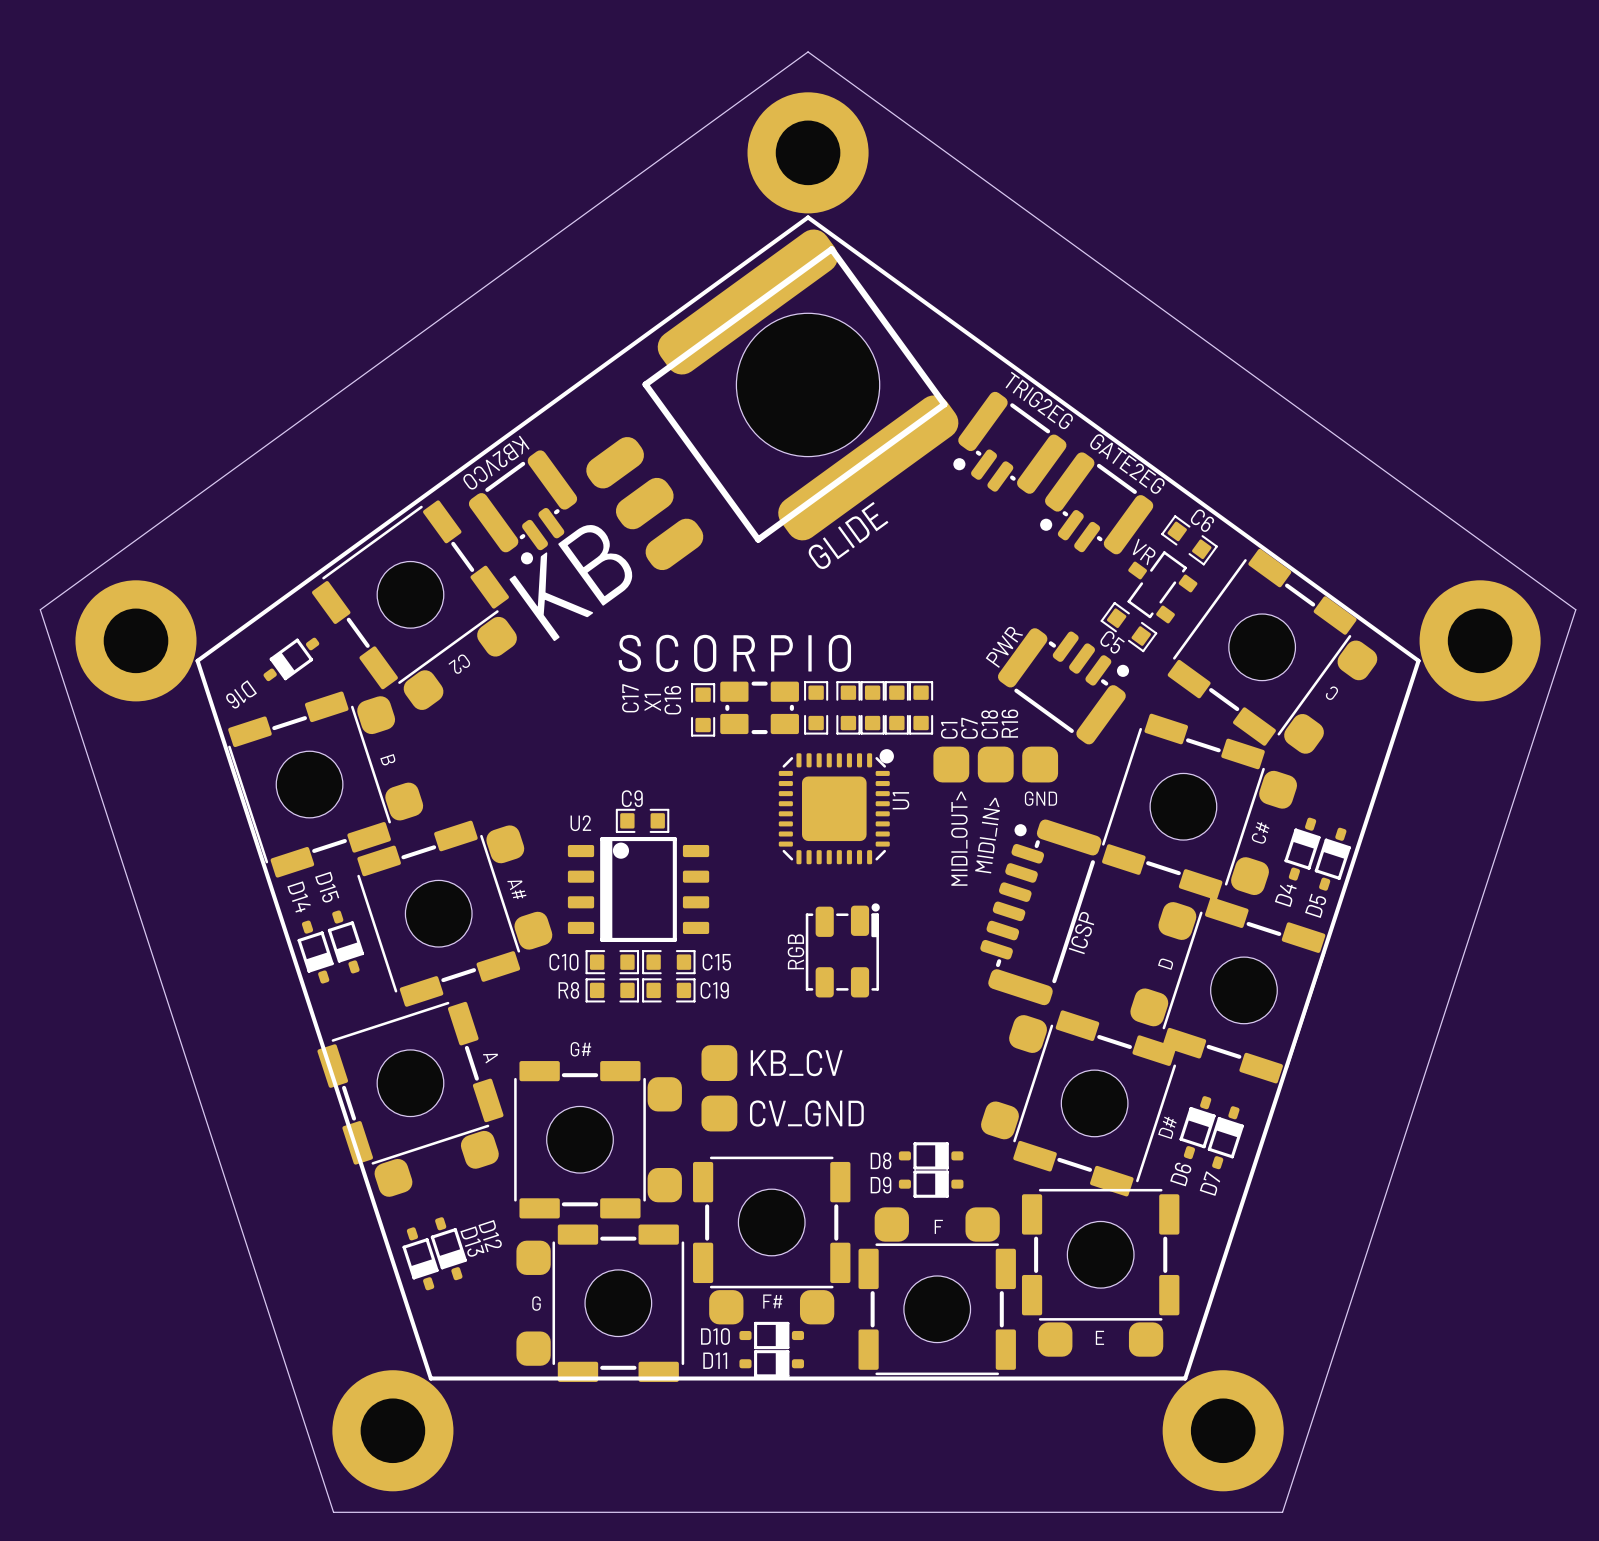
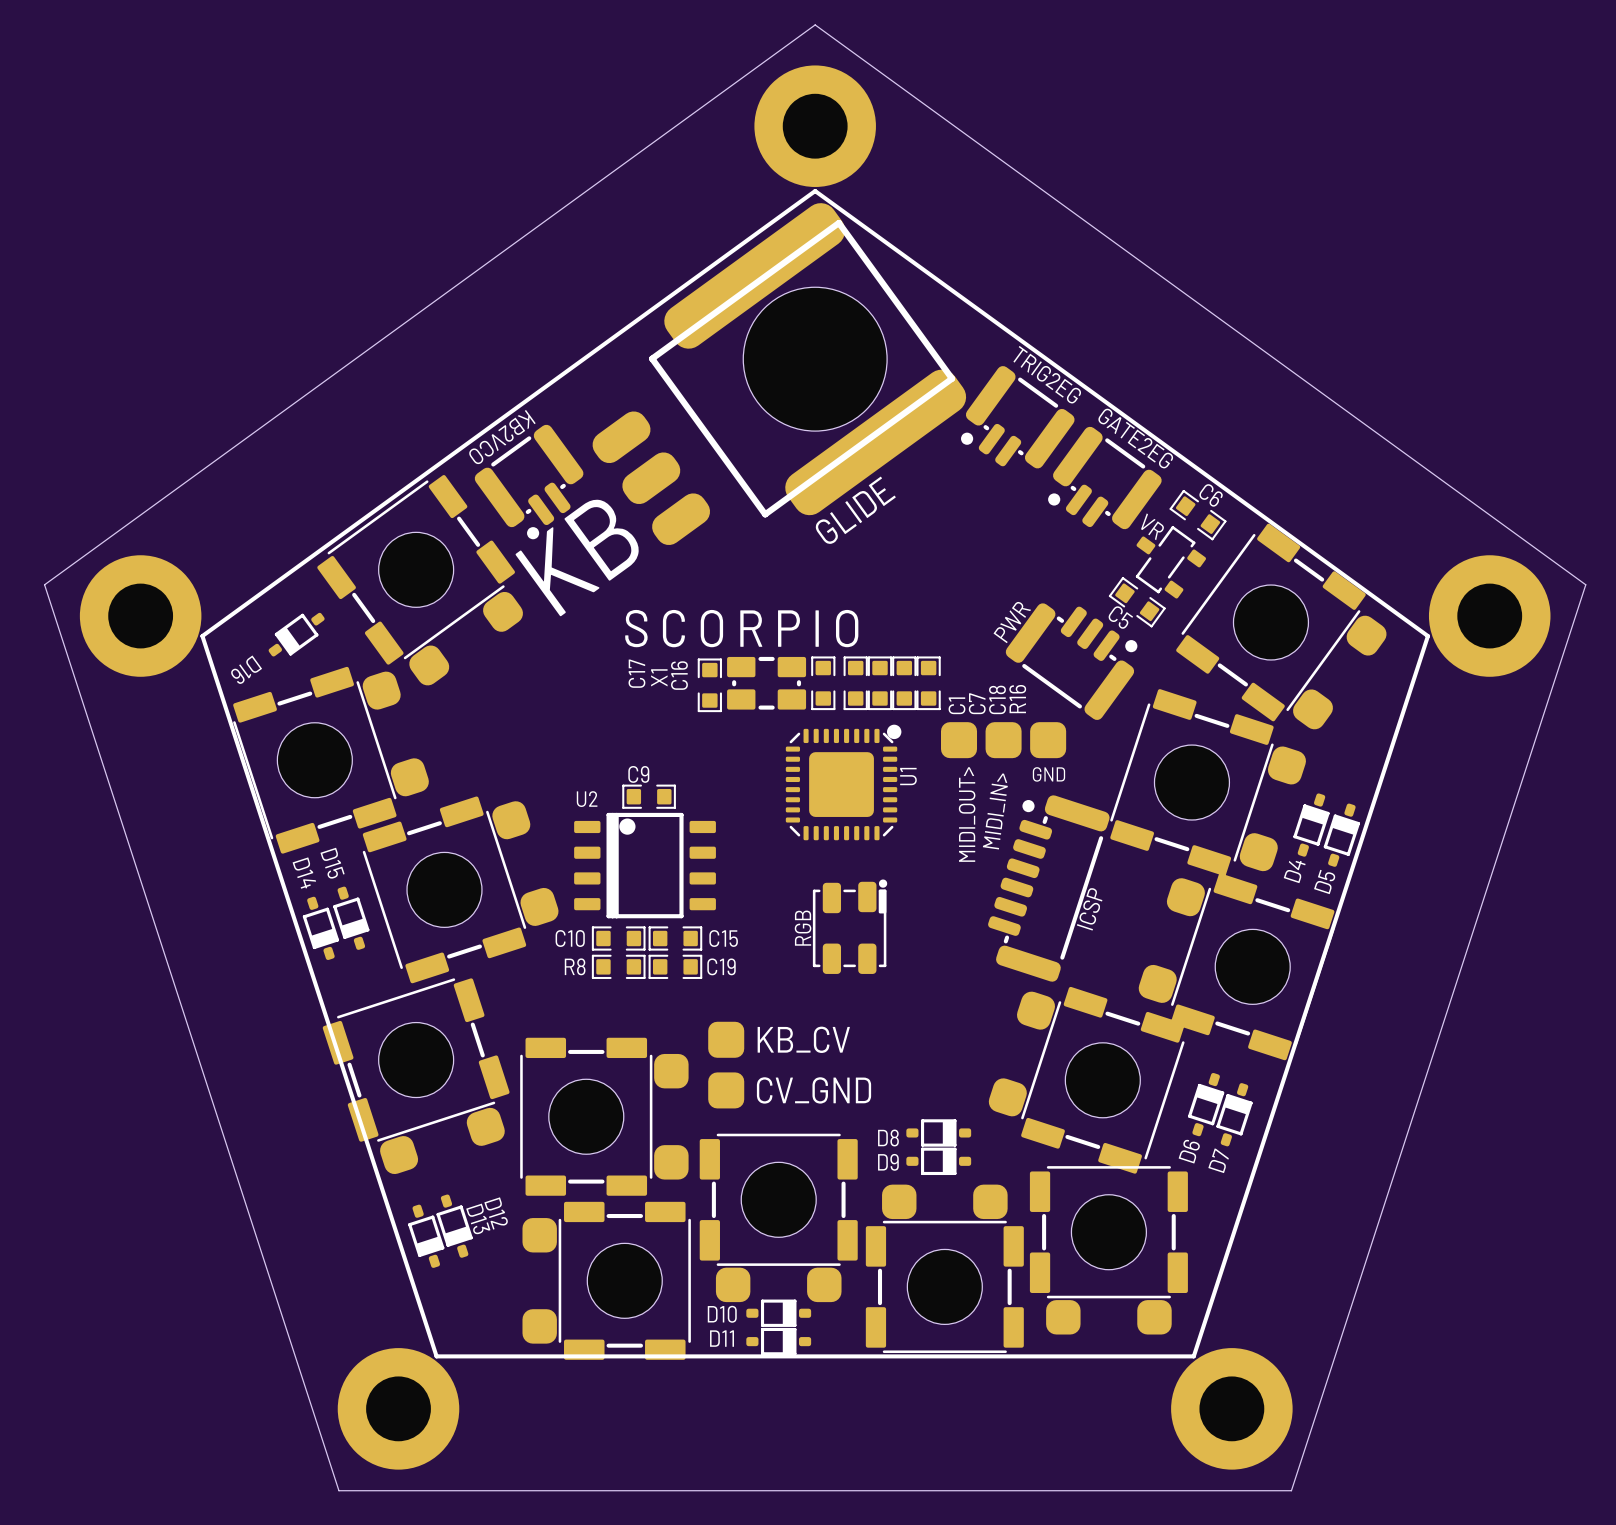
C2: (414, 605) -> none
part: none -> (420, 580)
C: (1272, 651) -> none
part: none -> (1281, 626)
B: (325, 784) -> none
part: none -> (331, 760)
C#: (1199, 806) -> none
part: none -> (1208, 782)
A#: (454, 913) -> none
part: none -> (460, 889)
D: (1227, 990) -> none
part: none -> (1236, 966)
A: (410, 1099) -> none
part: none -> (416, 1076)
D#: (1078, 1103) -> none
part: none -> (1086, 1080)
G#: (598, 1139) -> none
part: none -> (604, 1116)
F#: (771, 1240) -> none
part: none -> (778, 1217)
E: (1100, 1272) -> none
part: none -> (1108, 1250)
F: (937, 1291) -> none
part: none -> (944, 1268)
G: (600, 1303) -> none
part: none -> (606, 1280)

